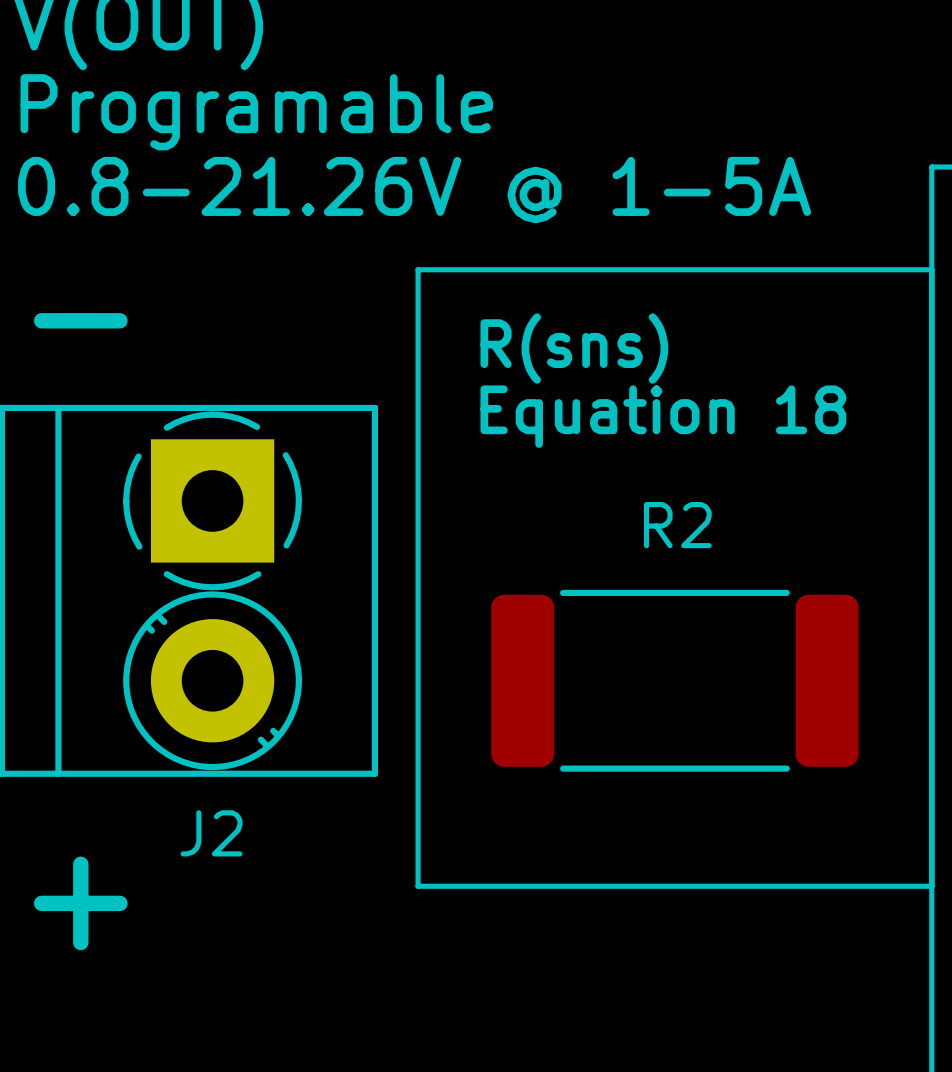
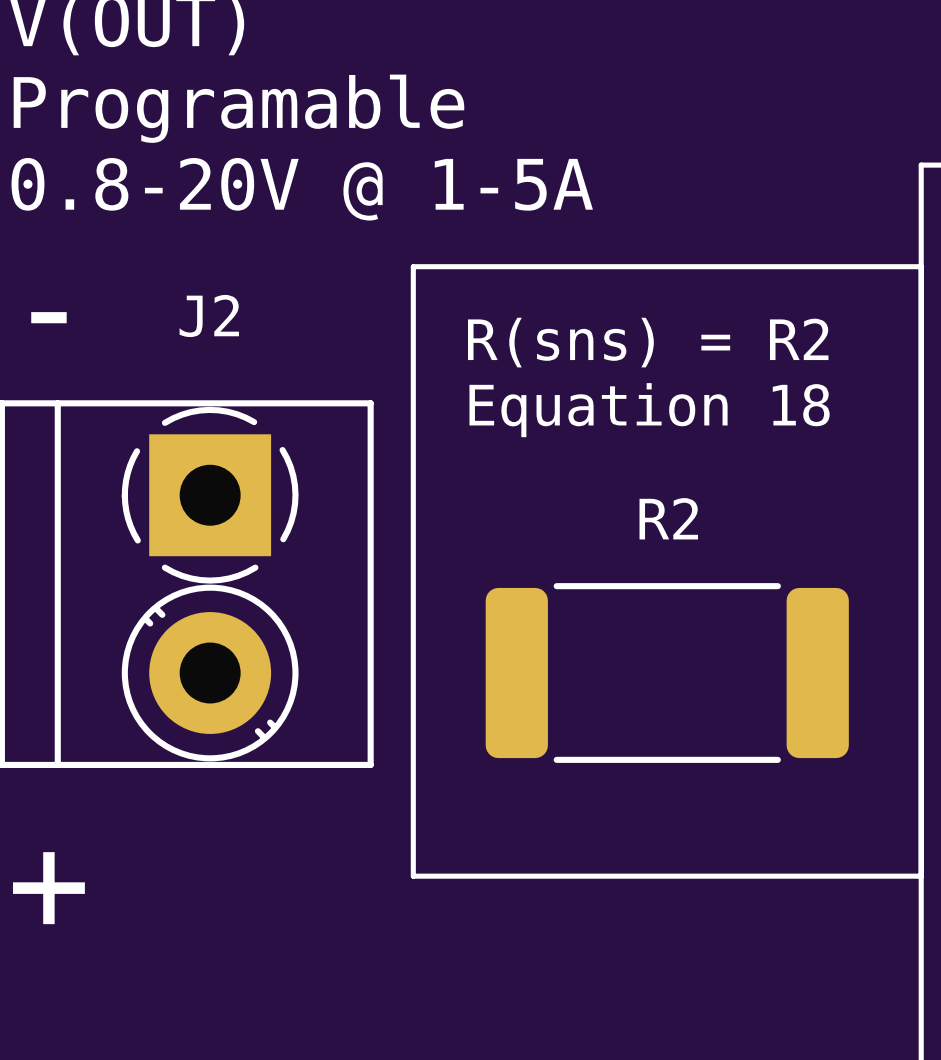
text: 0.8-21.26V @ 1-5A (414, 190) -> 0.8-20V @ 1-5A (302, 189)
text: R(sns) (574, 348) -> R(sns) = R2 (648, 342)
J2 name position: J2 (211, 833) -> J2 (209, 315)

